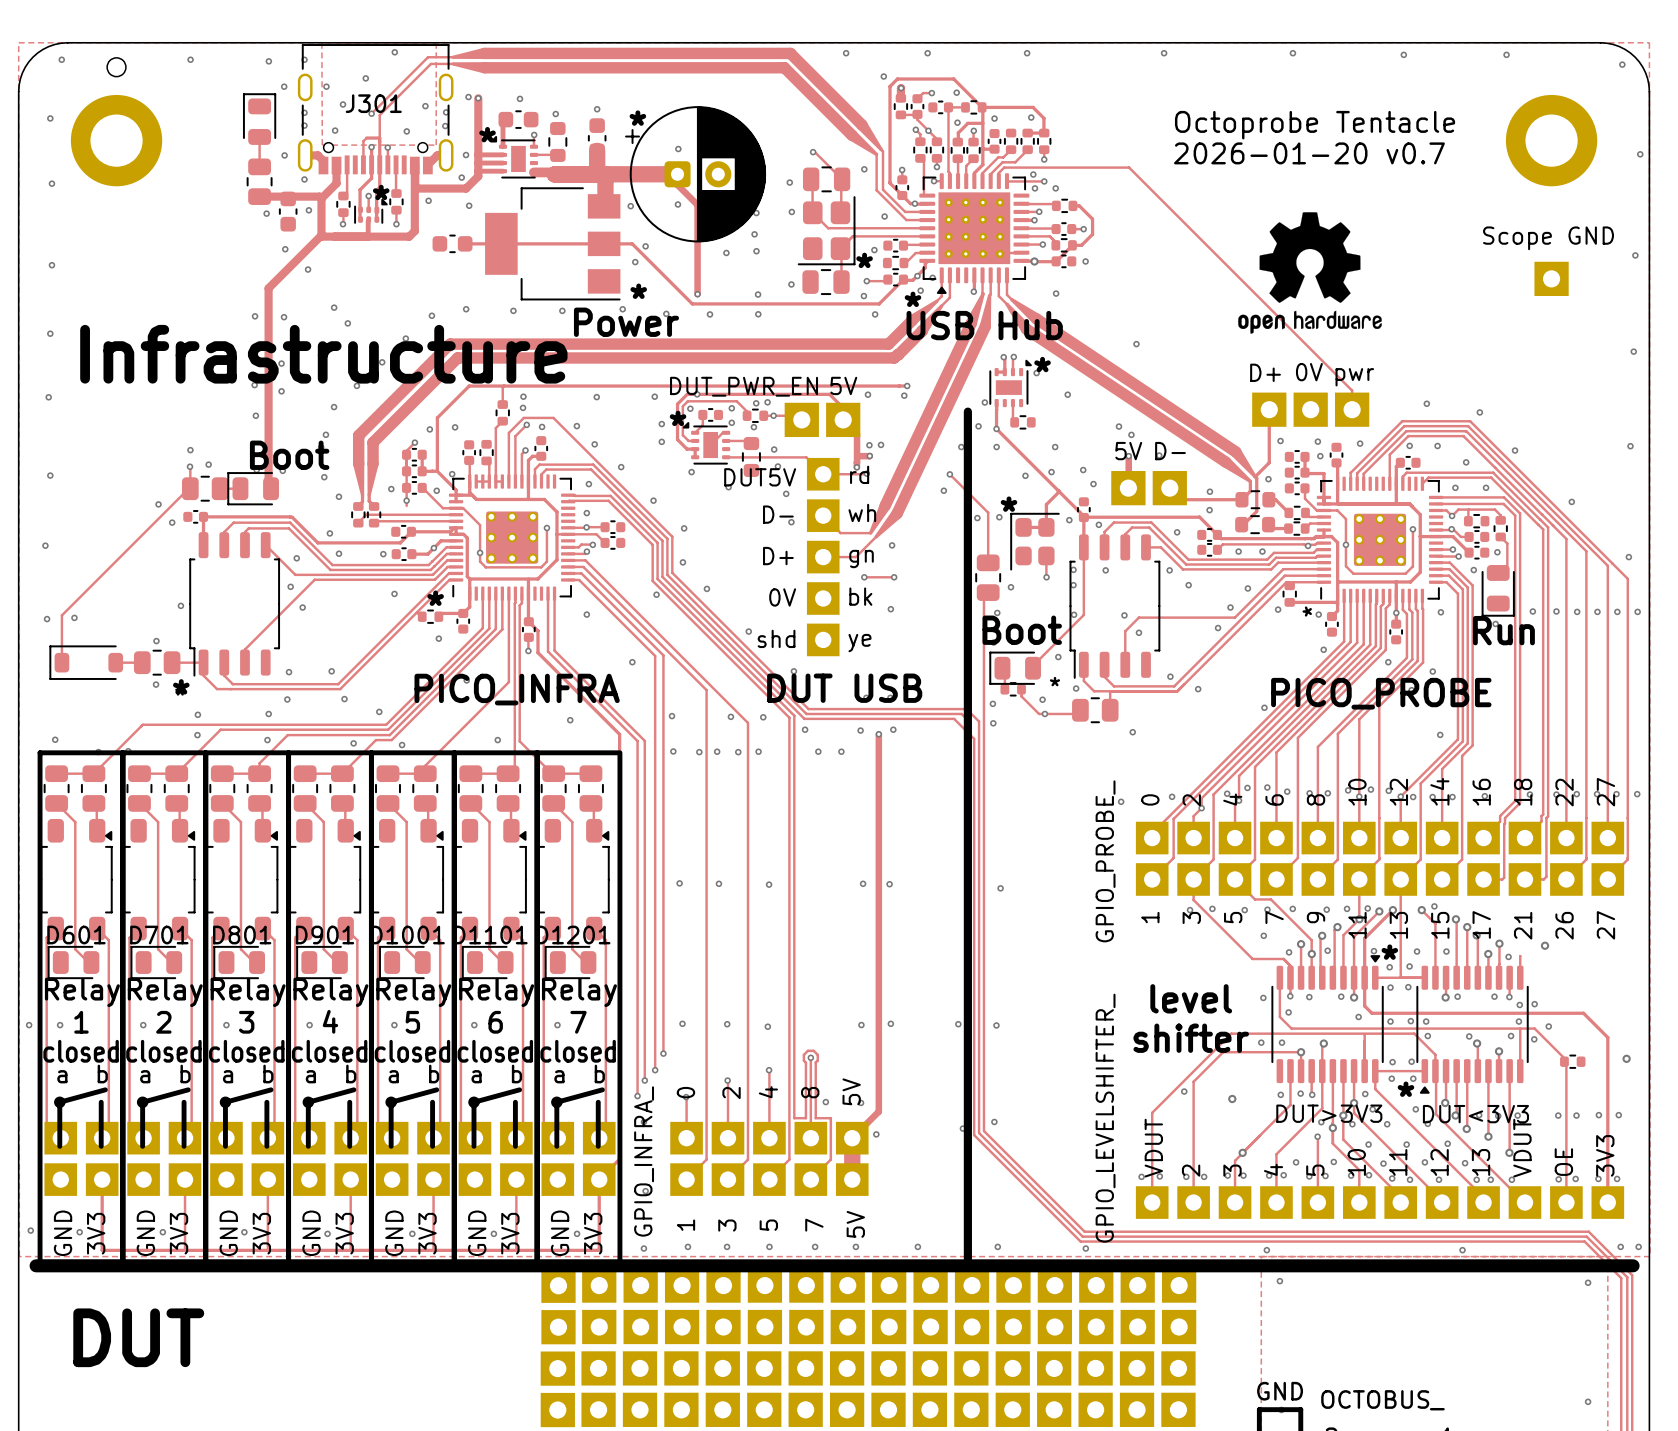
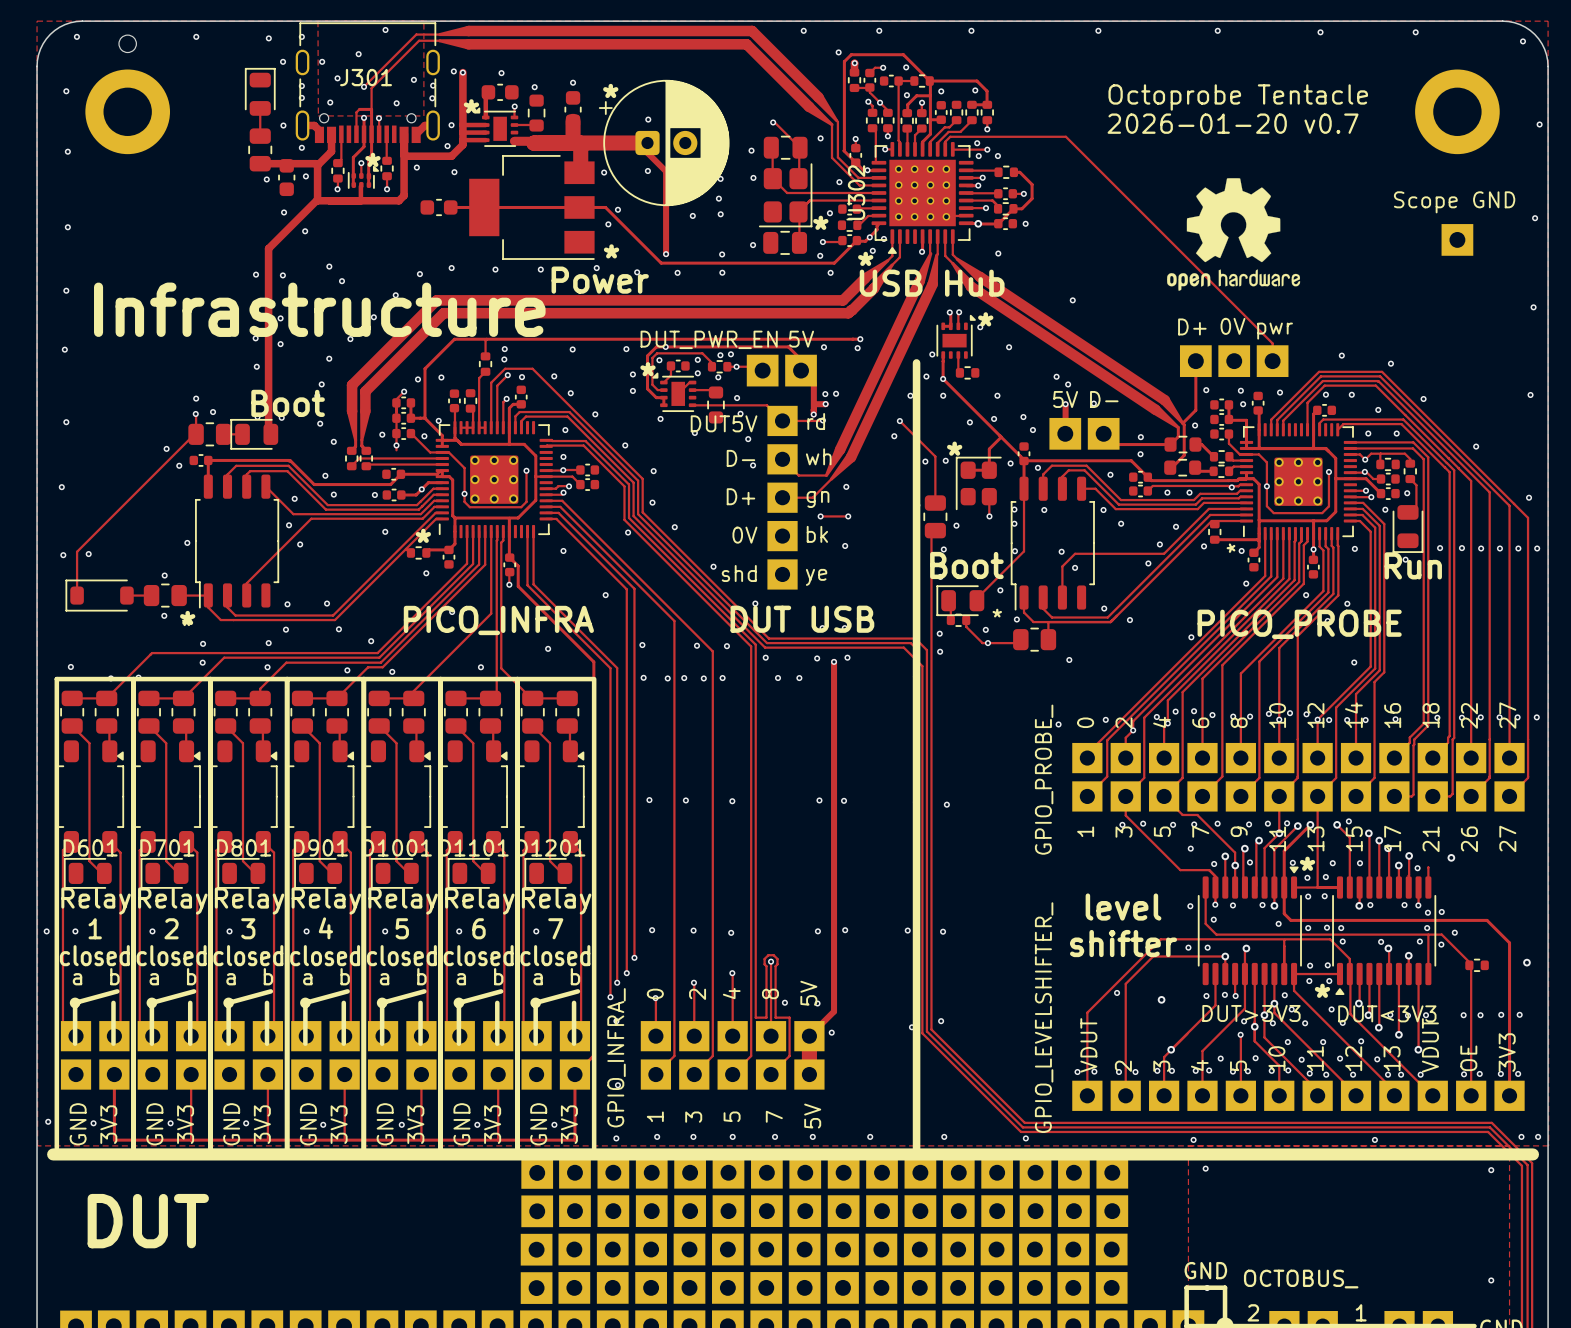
part: (974, 233) -> none
U302: none -> (922, 197)

